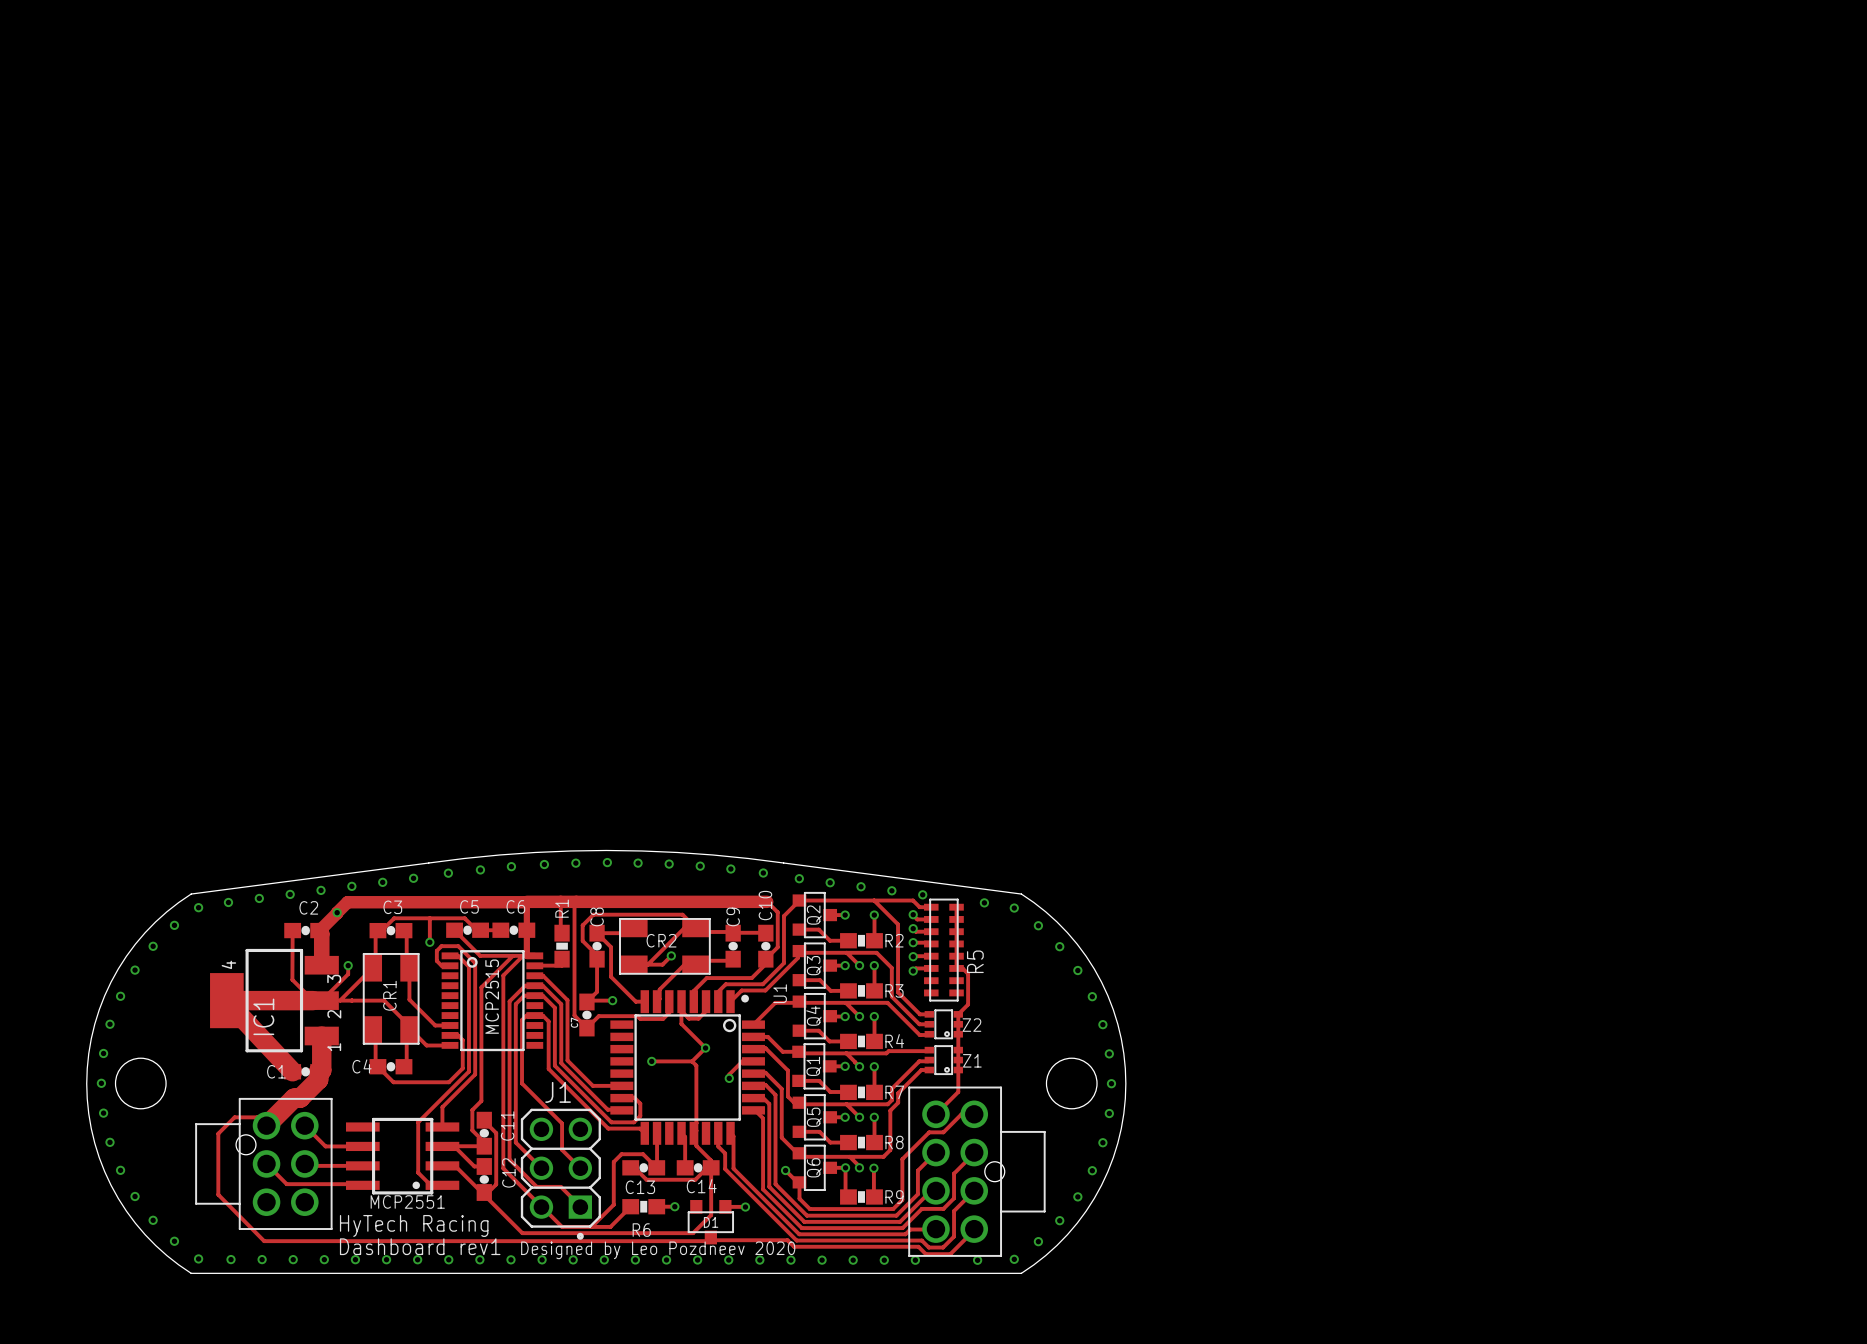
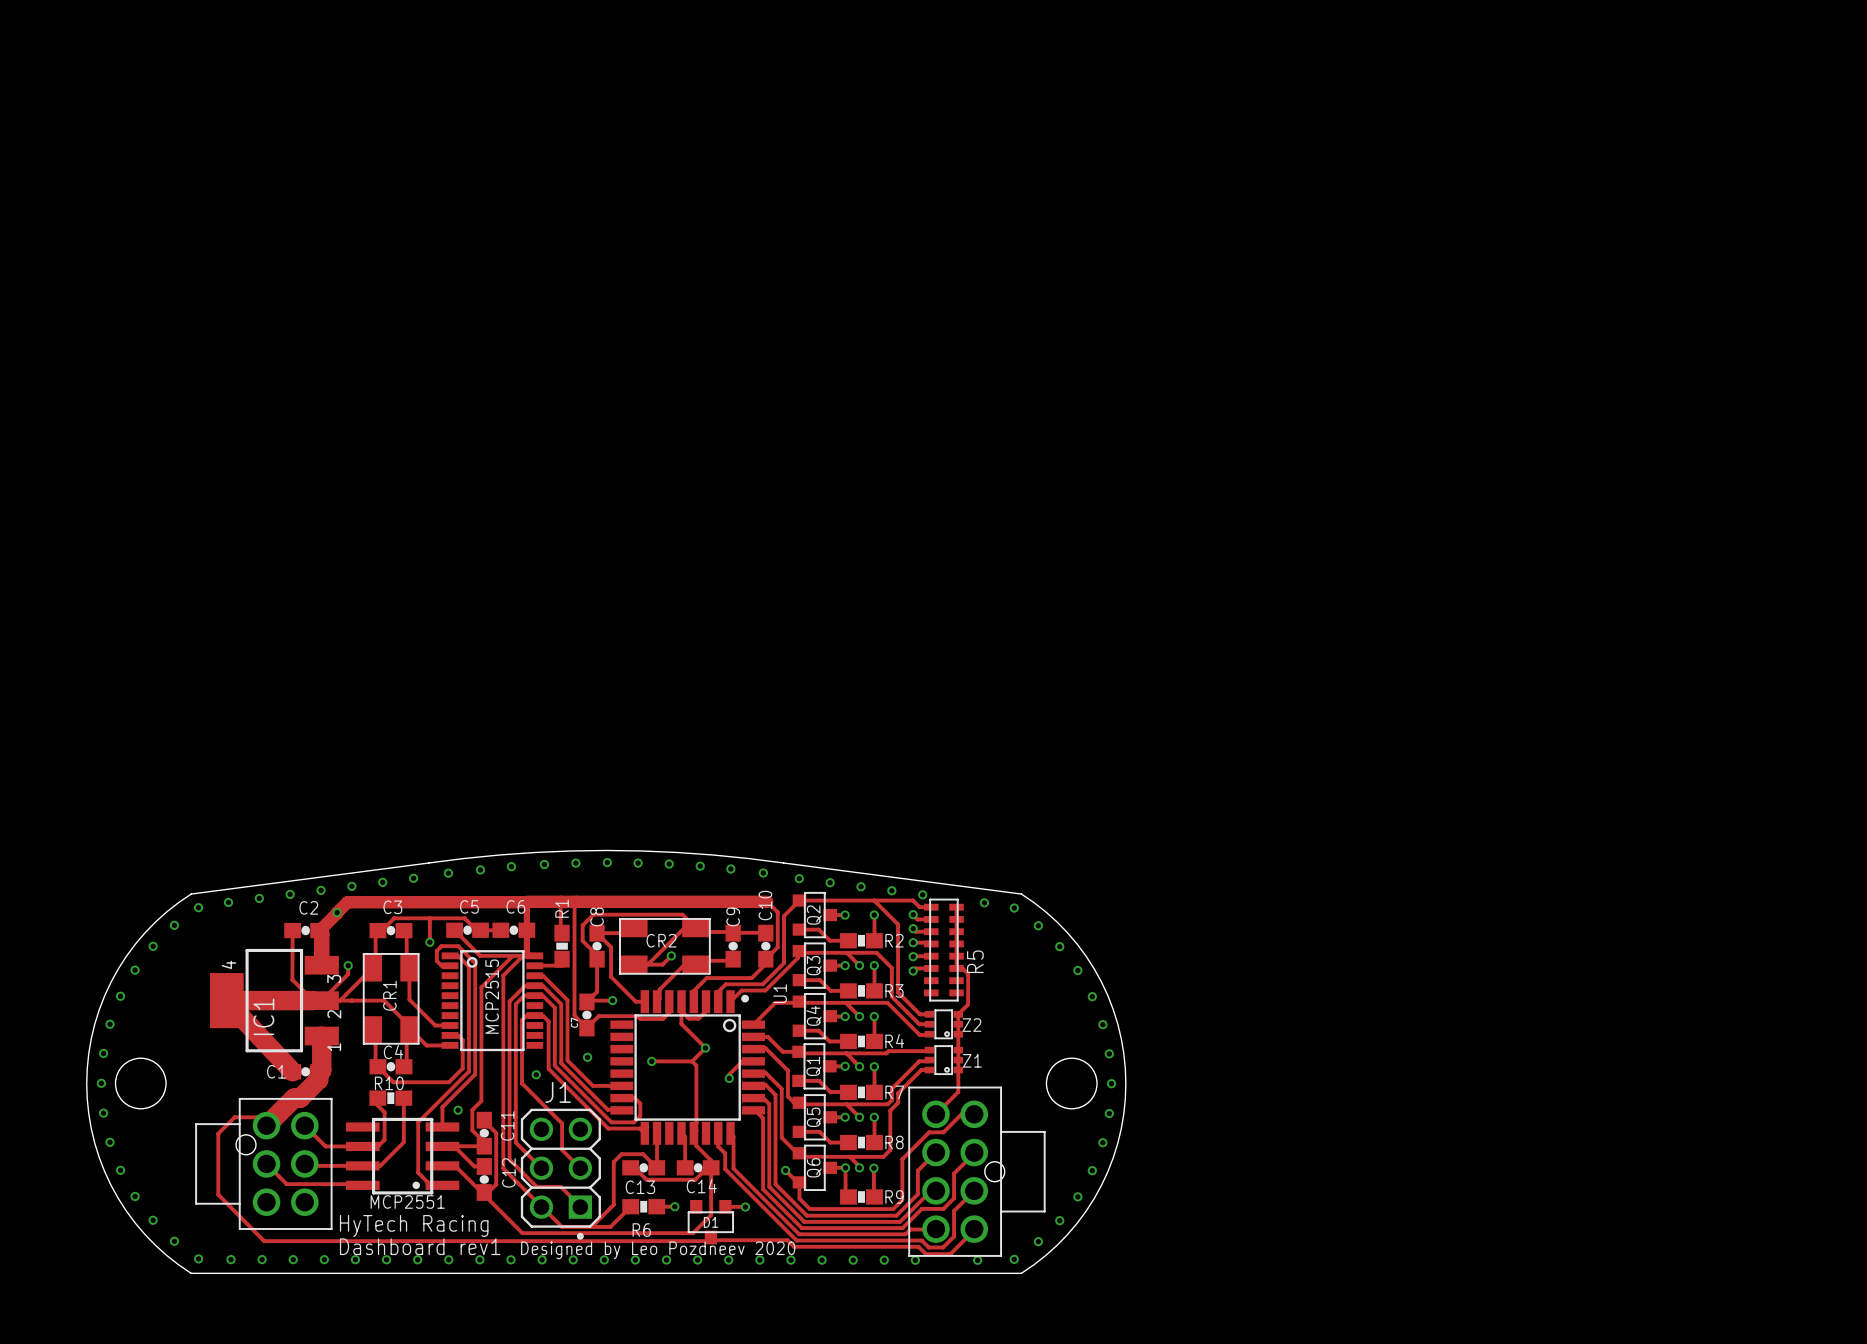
via: none -> (587, 1057)
C4 name position: C4 (361, 1066) -> C4 (393, 1052)
via: none -> (536, 1074)
track: none -> (377, 1098) (377, 1105) (384, 1112) (384, 1139) (378, 1145) (362, 1146)
R10: none -> (390, 1098)
track: none -> (403, 1098) (403, 1142) (380, 1165) (362, 1165)
via: none -> (458, 1110)

